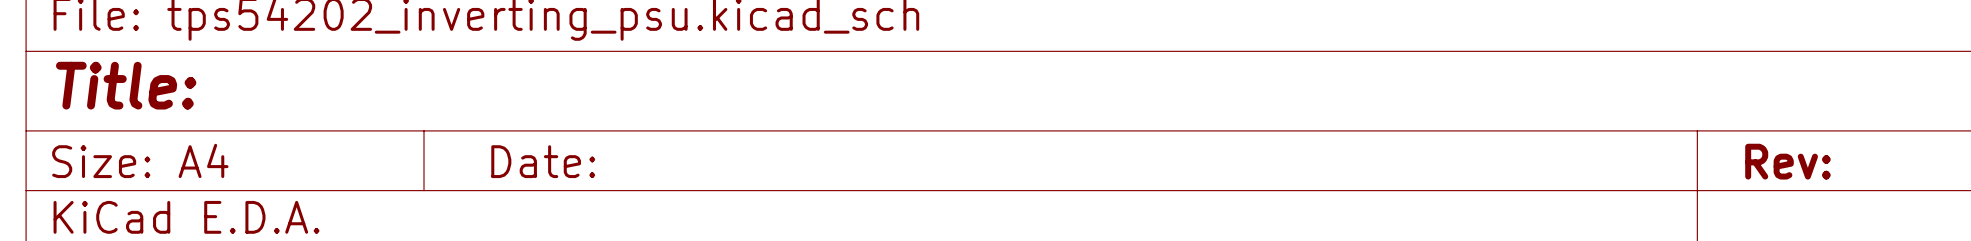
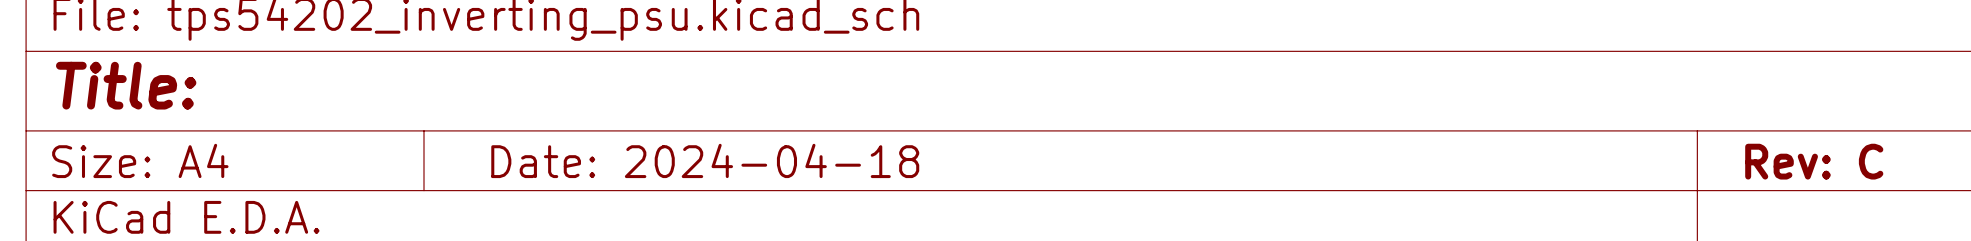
title block: Date: (543, 161) -> Date: 2024-04-18 (705, 160)
title block: Rev: (1787, 161) -> Rev: C (1814, 161)

